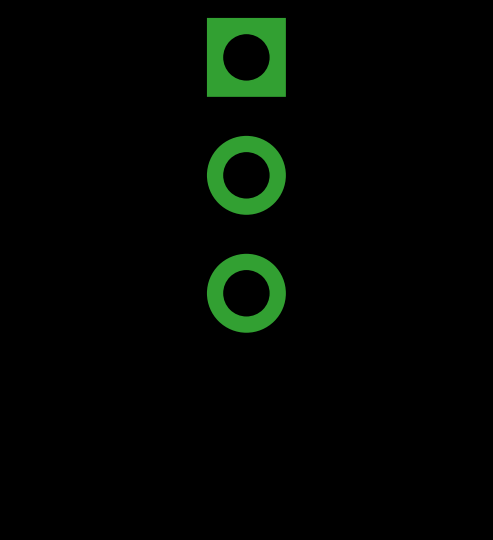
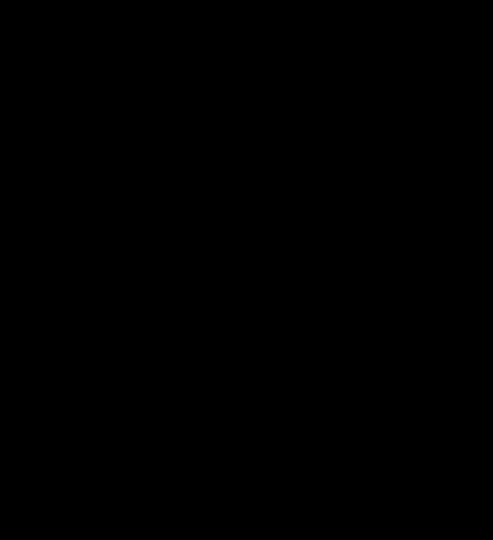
part: (246, 175) -> none

